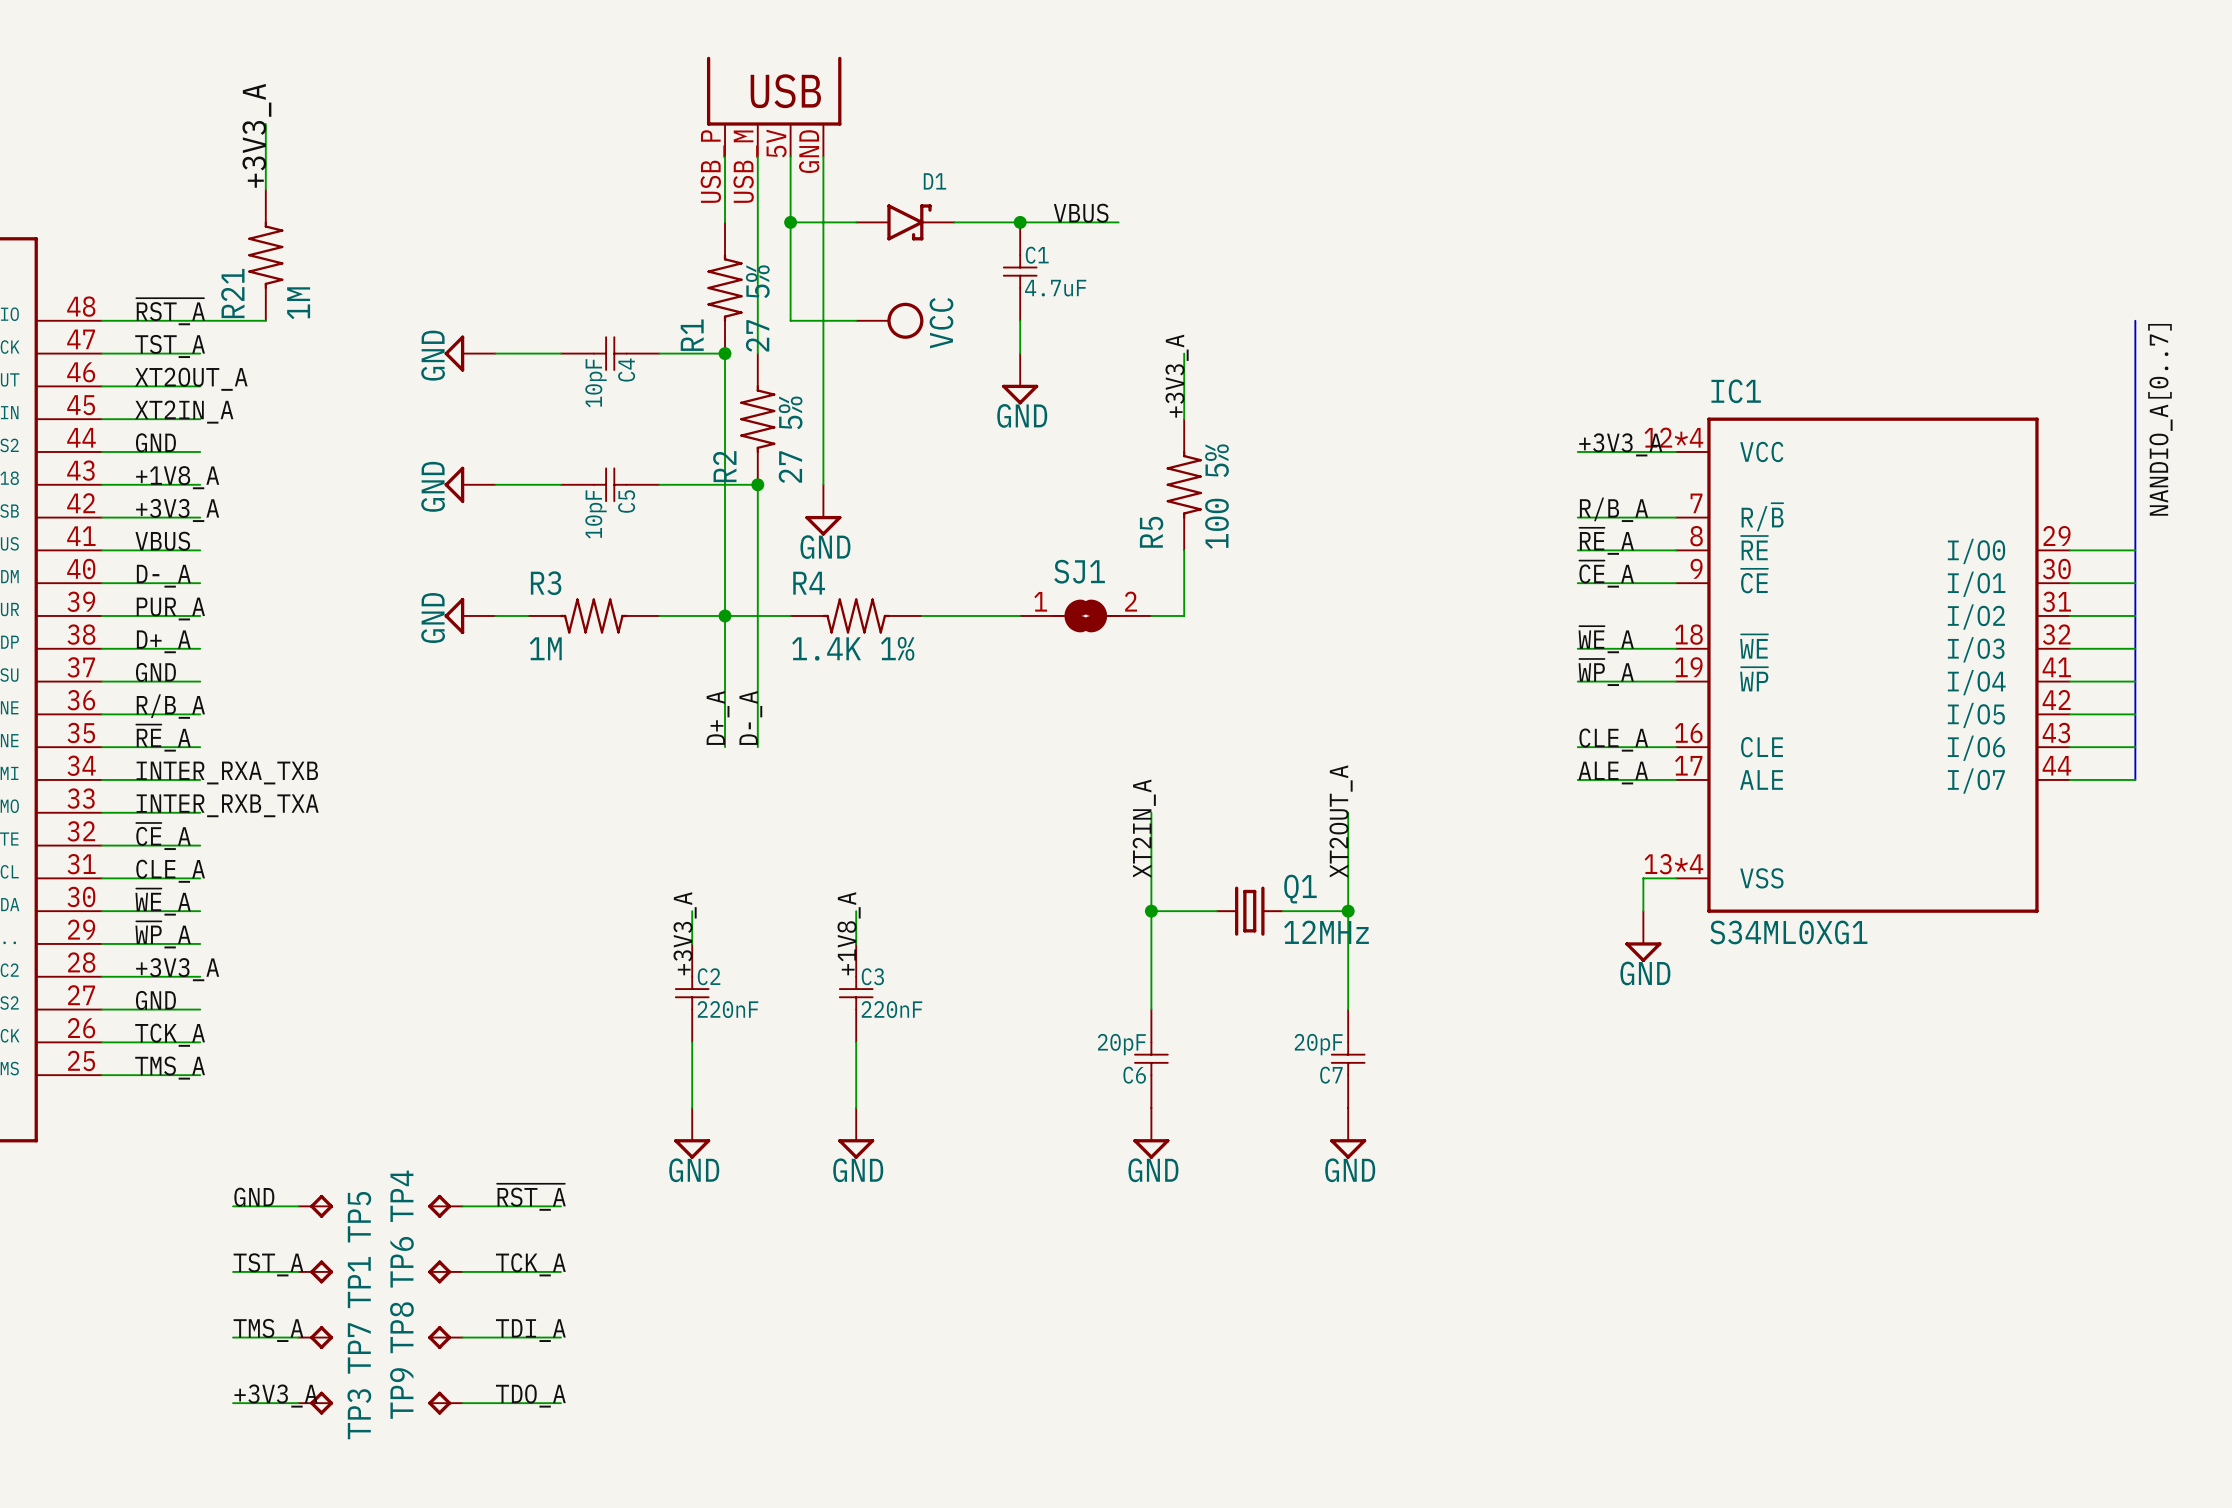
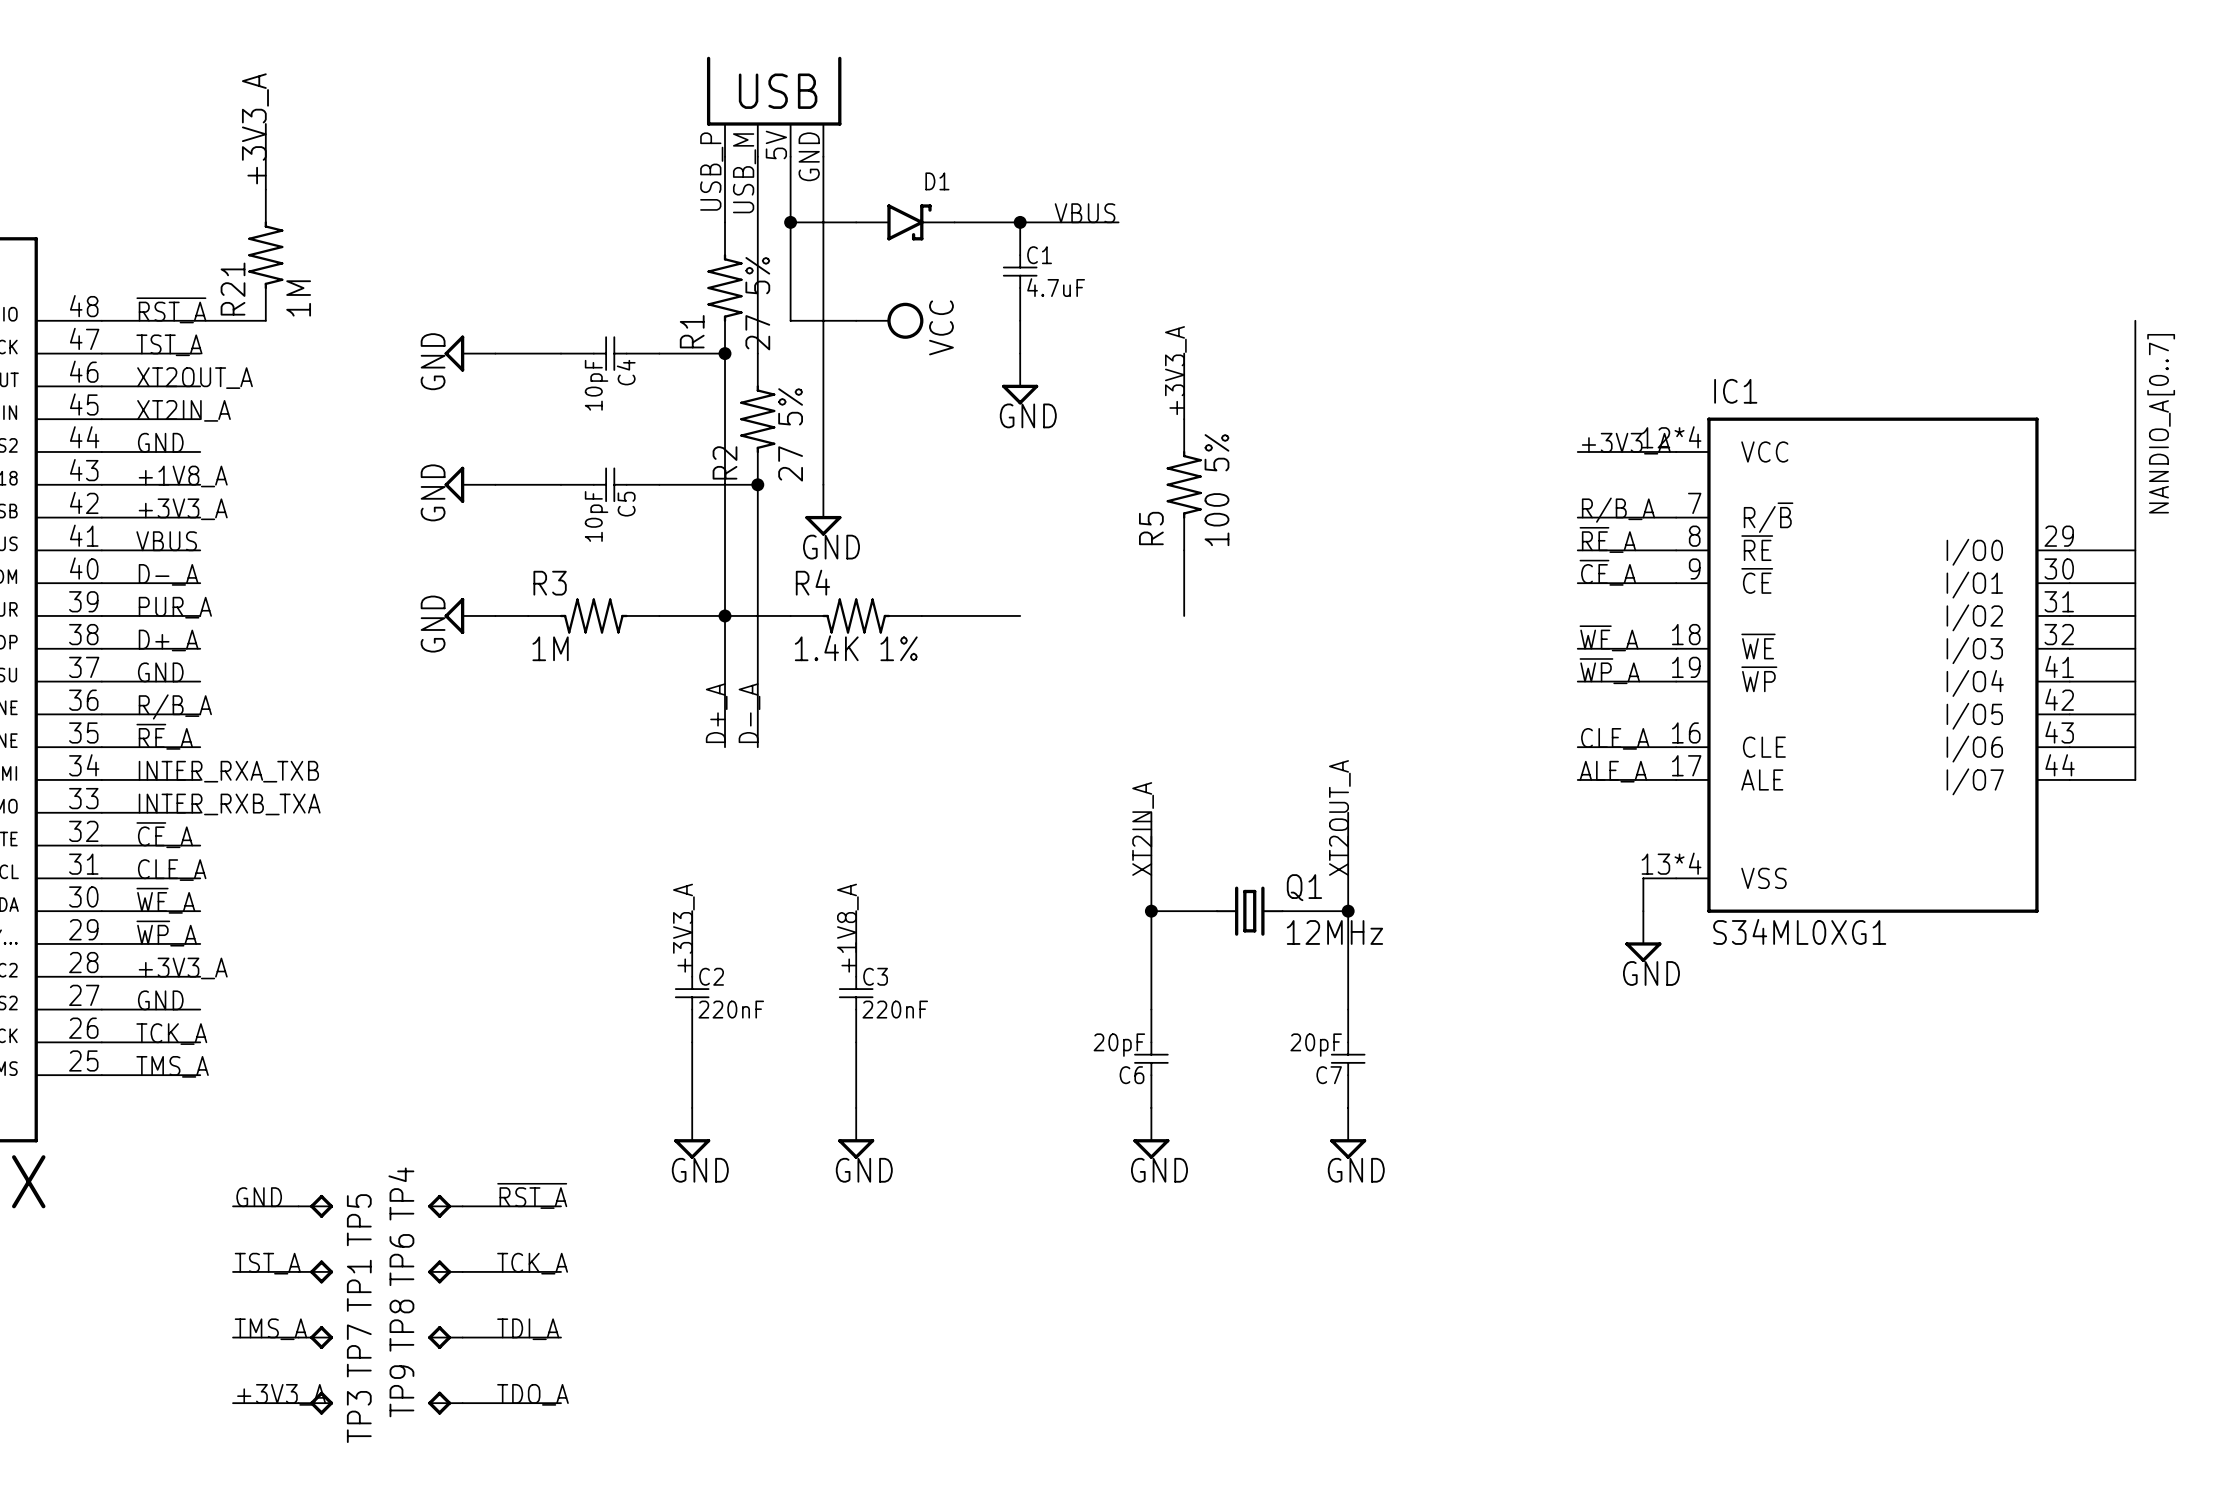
SJ1: (1085, 615) -> none
wire: (1151, 615) (1184, 615) -> none

